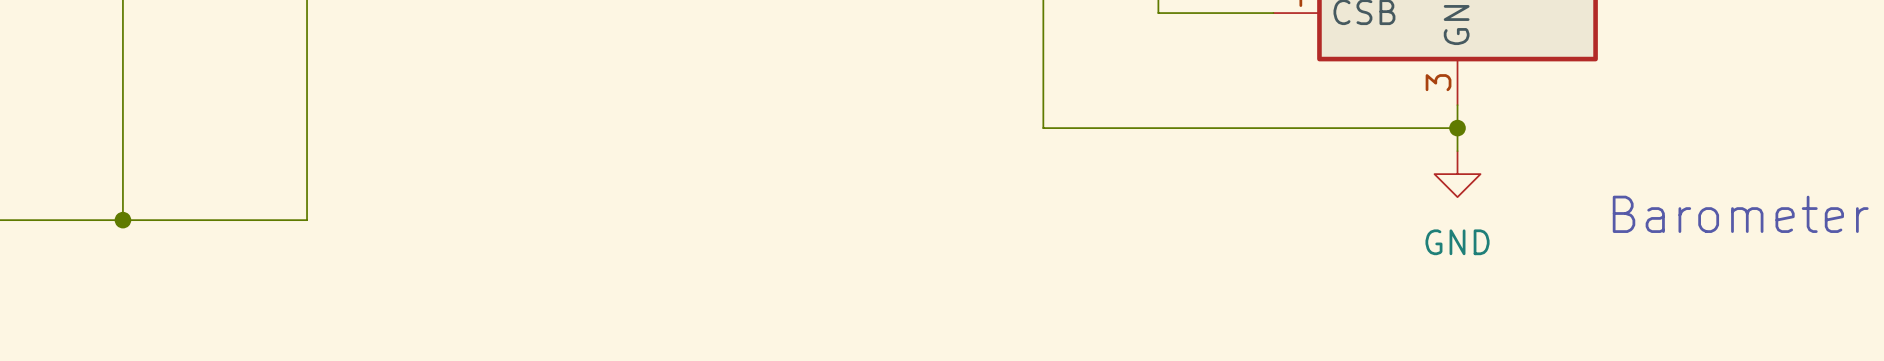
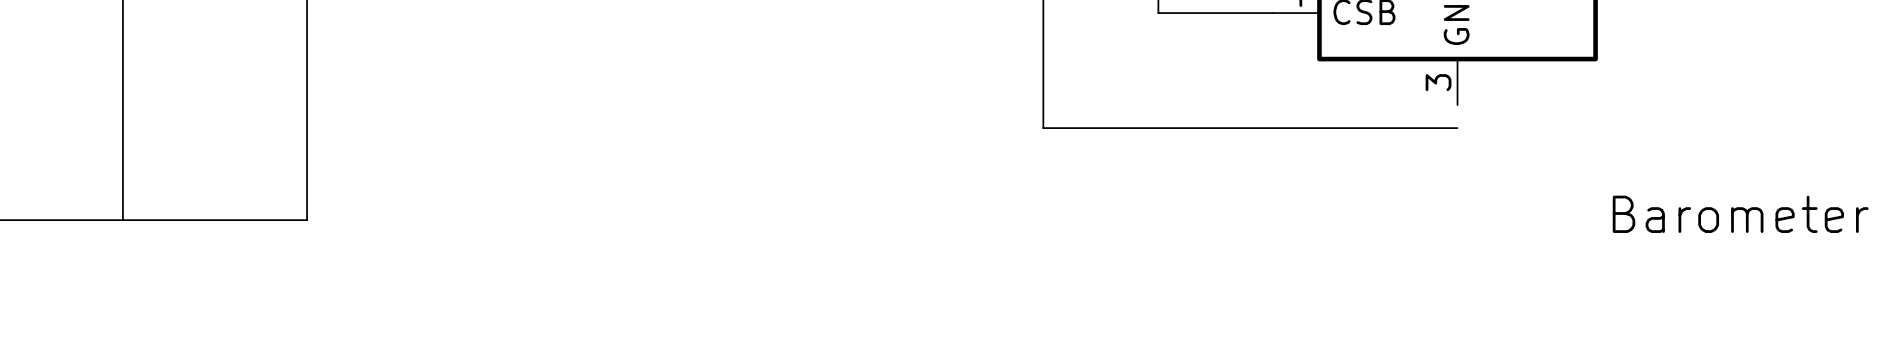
wire: (1457, 105) (1457, 151) -> none
junction: (1457, 128) -> none
power symbol: GND (1457, 174) -> none
junction: (122, 220) -> none

